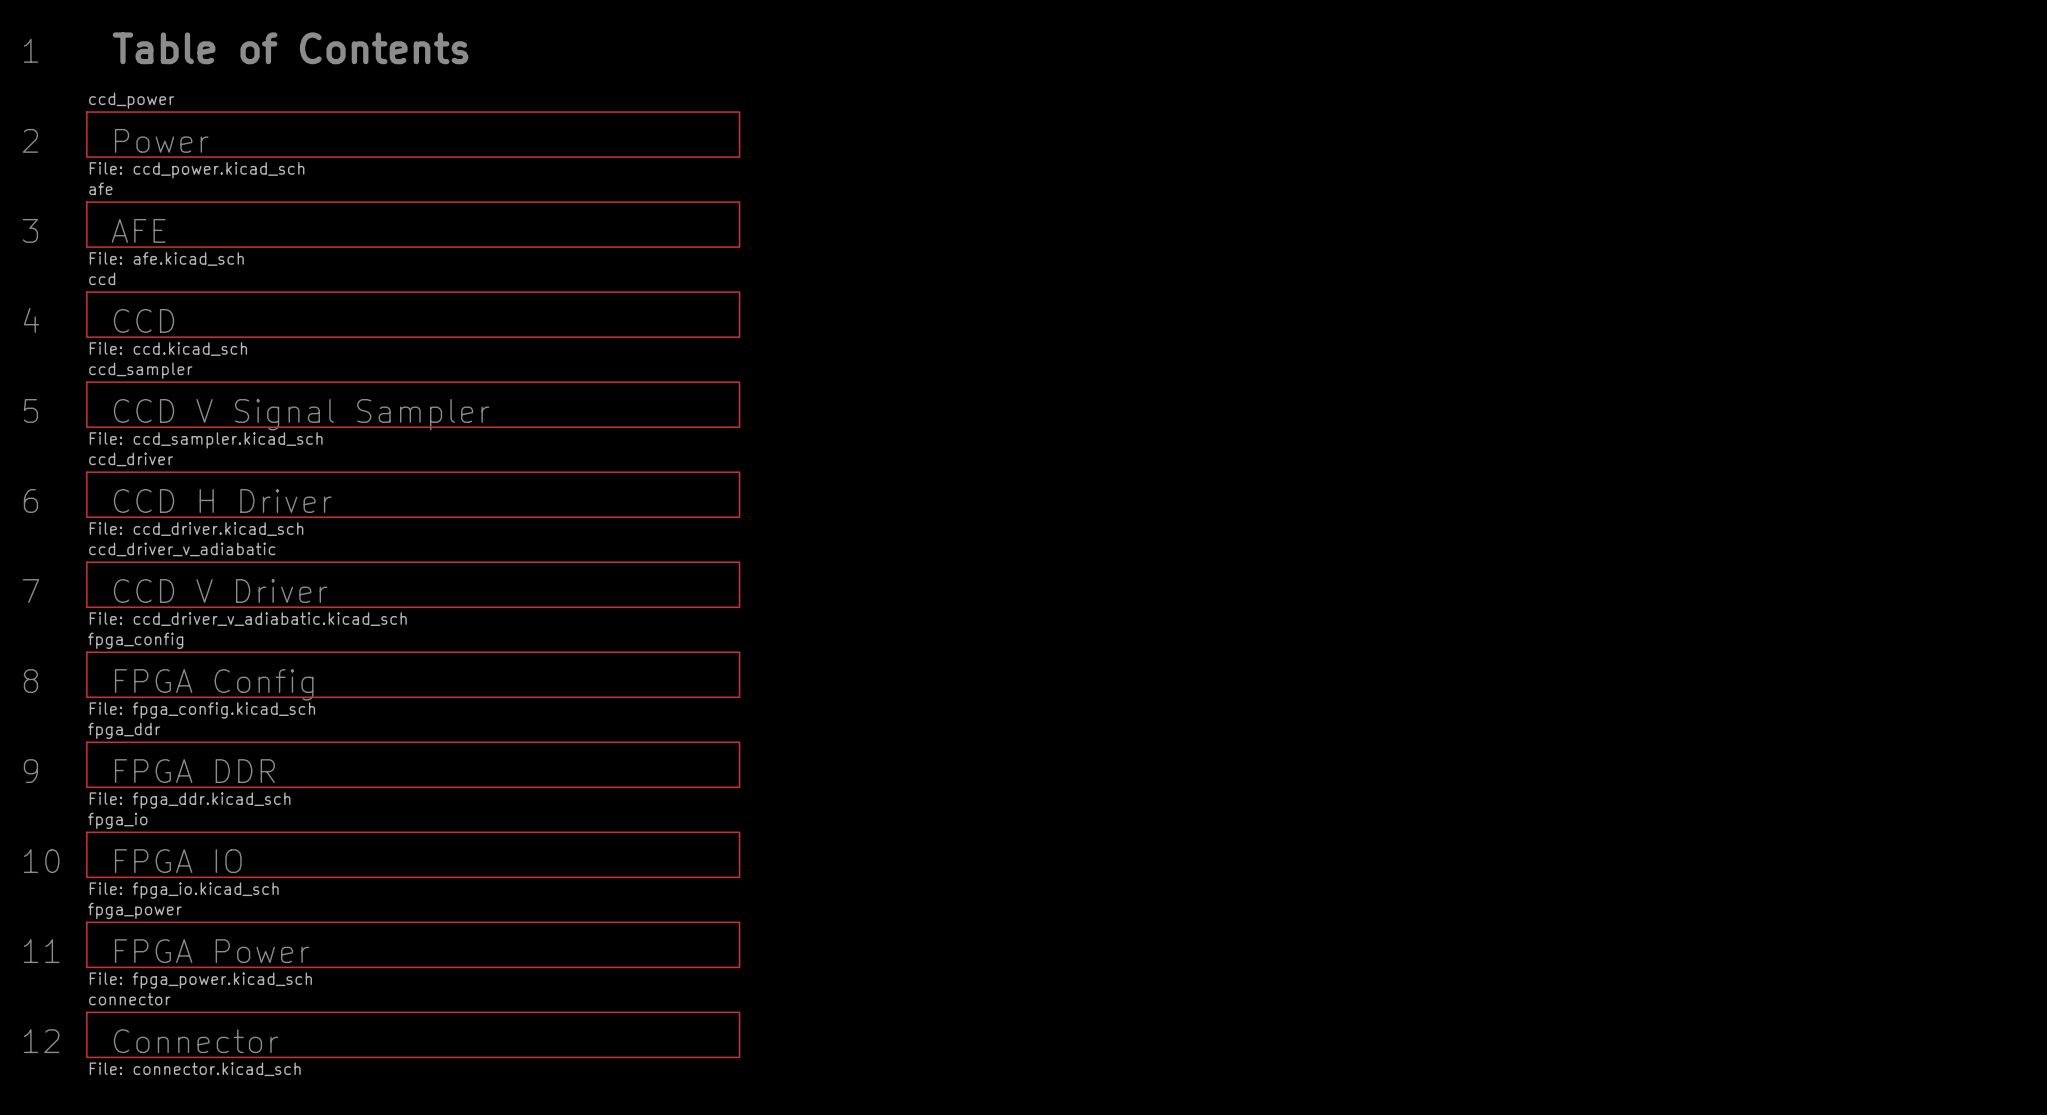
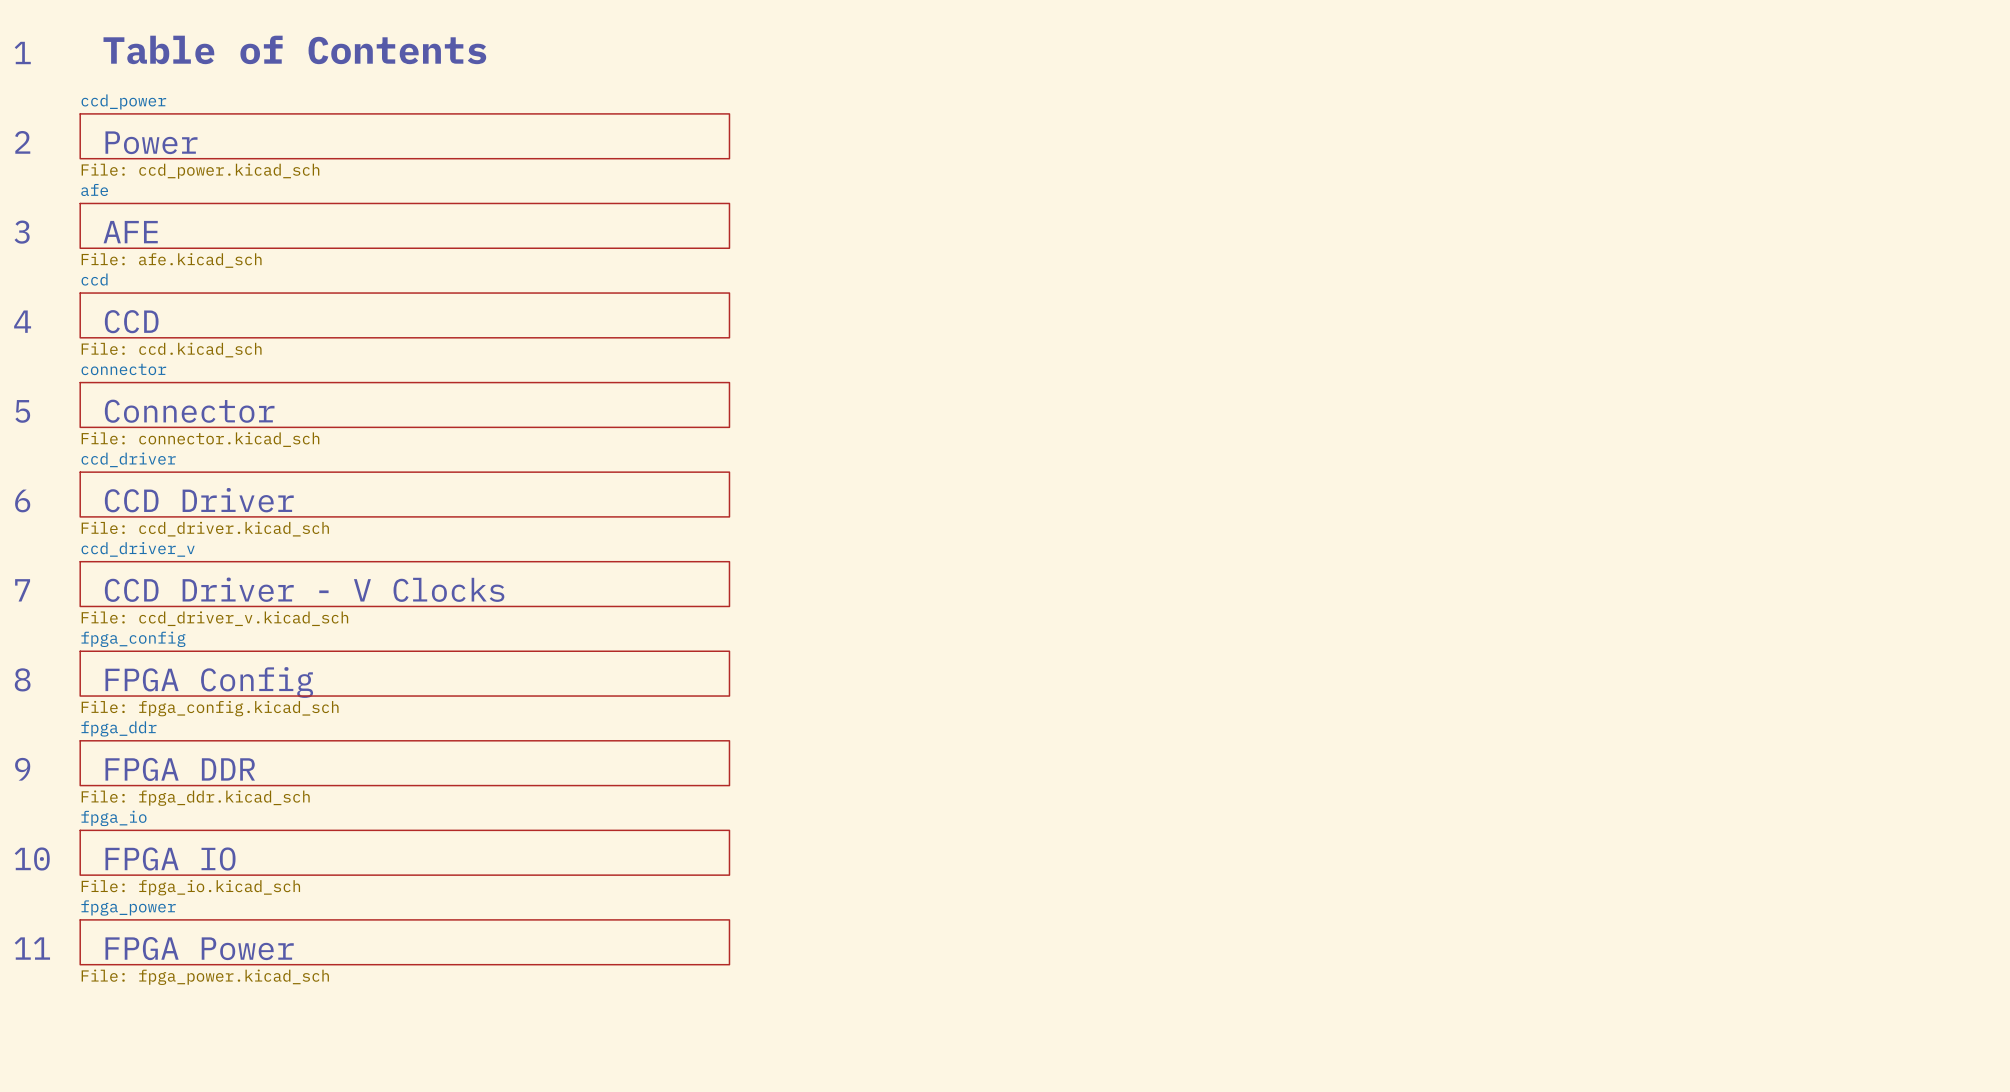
sheet ccd_sampler name: ccd_sampler (140, 370) -> connector (123, 369)
text: CCD V Signal Sampler (301, 414) -> Connector (189, 411)
sheet ccd_sampler value: File: ccd_sampler.kicad_sch (206, 440) -> File: connector.kicad_sch (200, 439)
text: CCD H Driver (222, 500) -> CCD Driver (199, 500)
sheet ccd_driver_v_adiabatic name: ccd_driver_v_adiabatic (182, 549) -> ccd_driver_v (138, 549)
text: CCD V Driver (220, 591) -> CCD Driver - V Clocks (304, 589)
sheet ccd_driver_v_adiabatic value: File: ccd_driver_v_adiabatic.kicad_sch (248, 619) -> File: ccd_driver_v.kicad_sch (214, 618)
sheet connector: File: connector.kicad_sch (413, 1034) -> none
text: 12 (41, 1041) -> none
text: Connector (195, 1041) -> none

